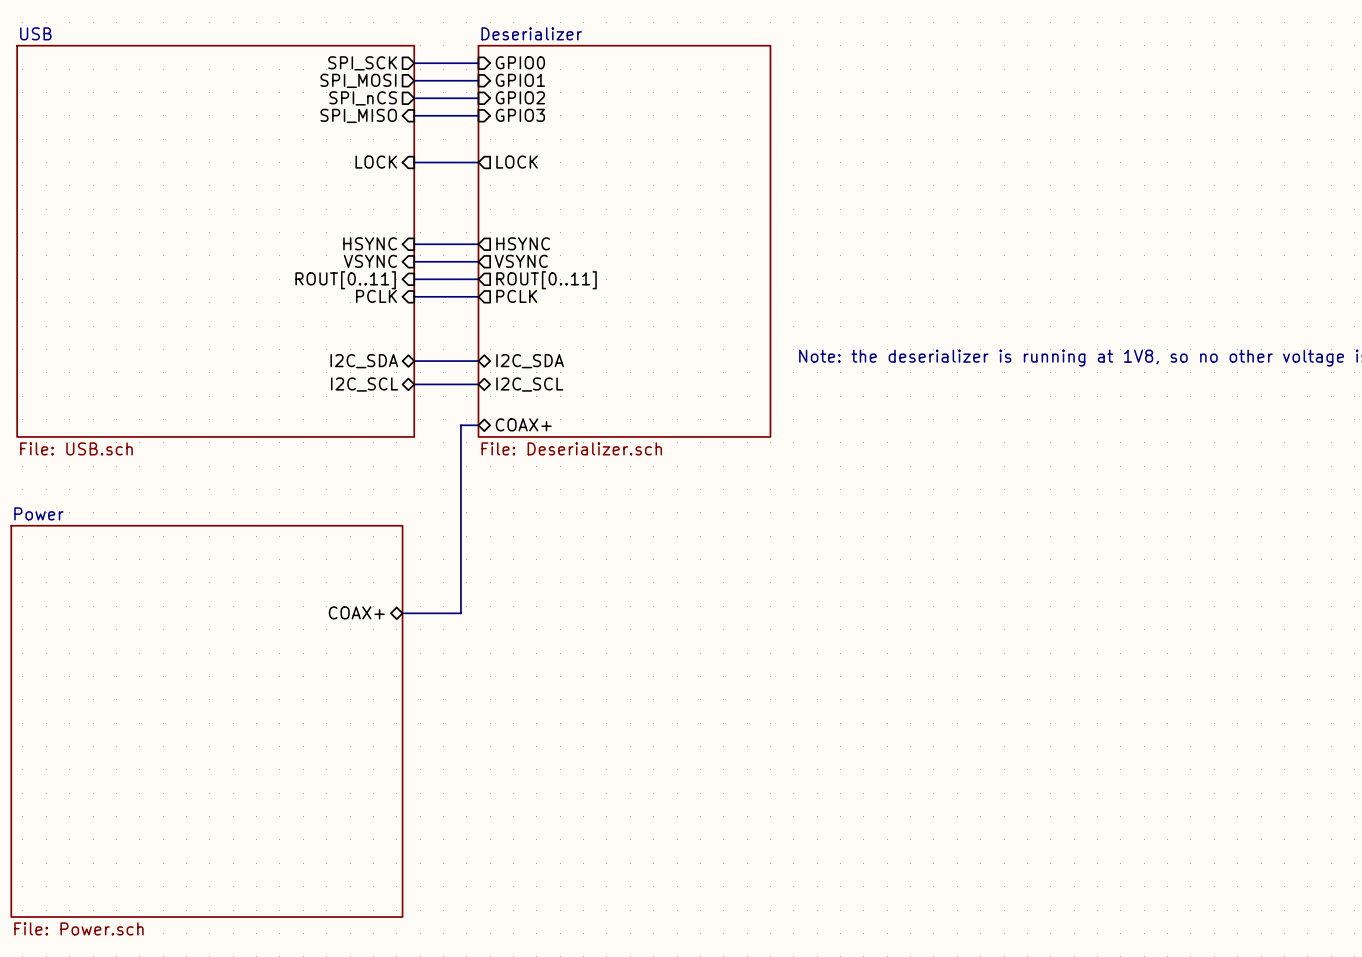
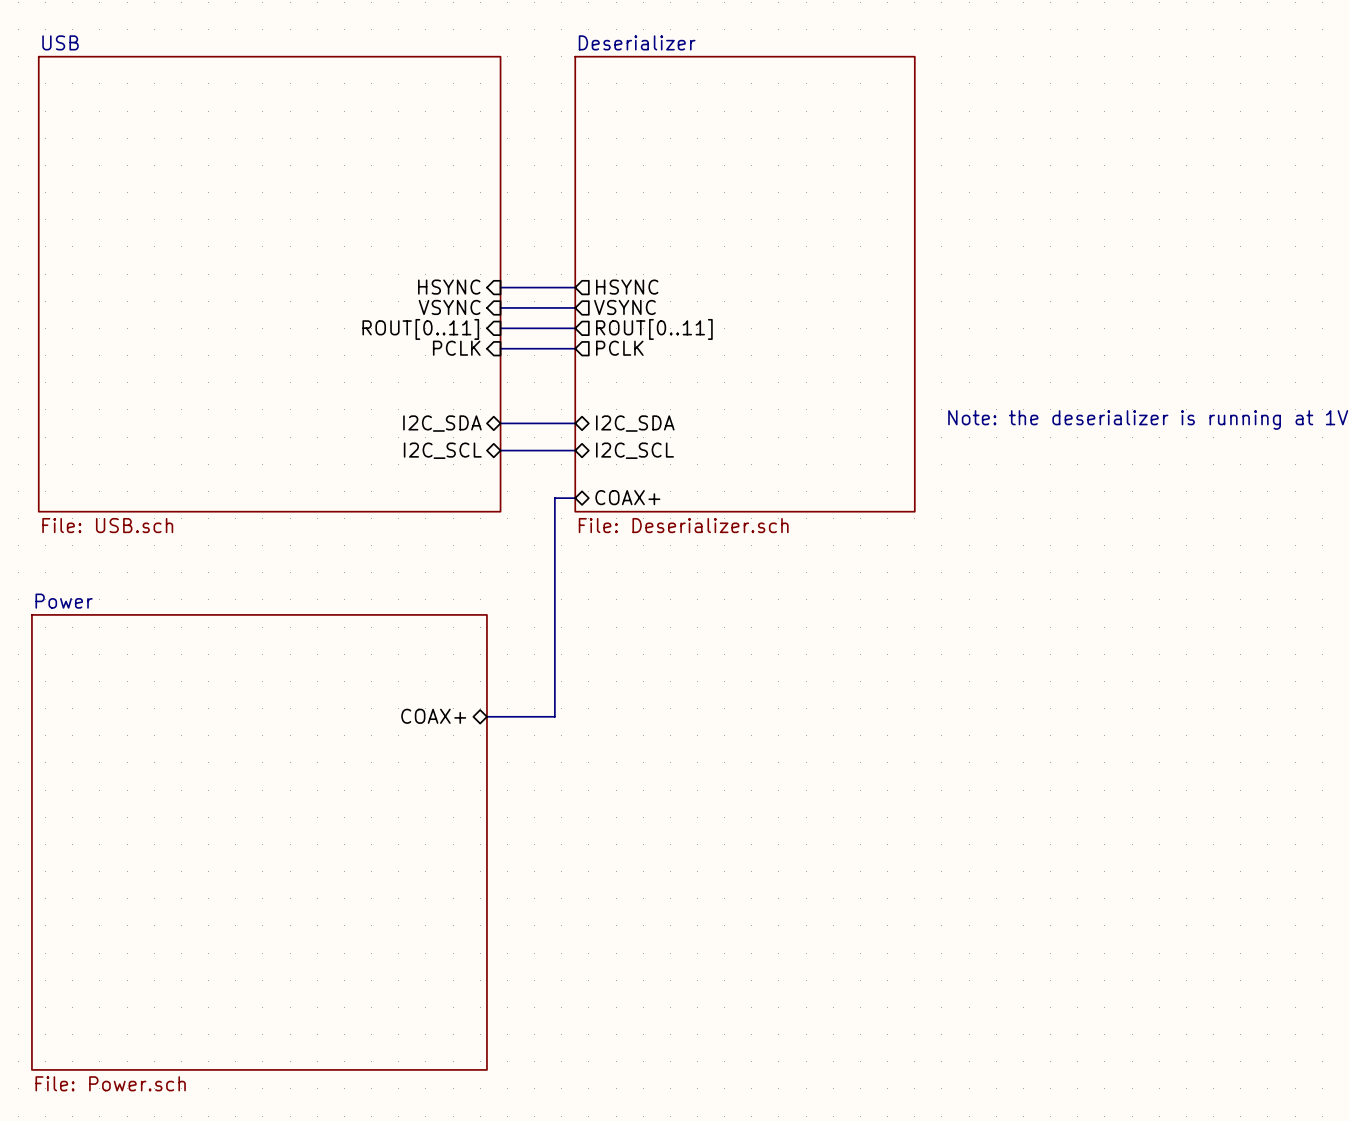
sheet pin: GPIO0 (520, 62) -> none
sheet pin: SPI_SCK (362, 63) -> none
wire: (414, 63) (478, 63) -> none
sheet pin: SPI_MOSI (358, 80) -> none
wire: (414, 80) (478, 80) -> none
sheet pin: GPIO1 (520, 80) -> none
sheet pin: GPIO2 (520, 97) -> none
sheet pin: SPI_nCS (363, 98) -> none
wire: (414, 98) (478, 98) -> none
sheet pin: SPI_MISO (358, 115) -> none
wire: (414, 115) (478, 115) -> none
sheet pin: GPIO3 (520, 115) -> none
sheet pin: LOCK (376, 162) -> none
wire: (414, 162) (478, 162) -> none
sheet pin: LOCK (517, 162) -> none

